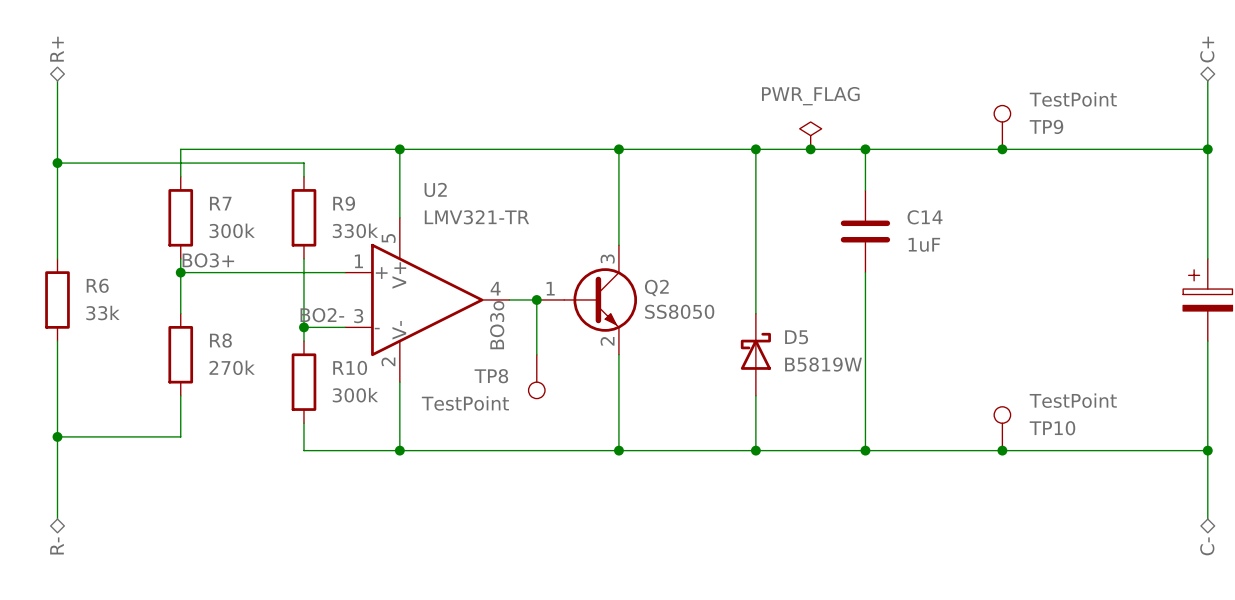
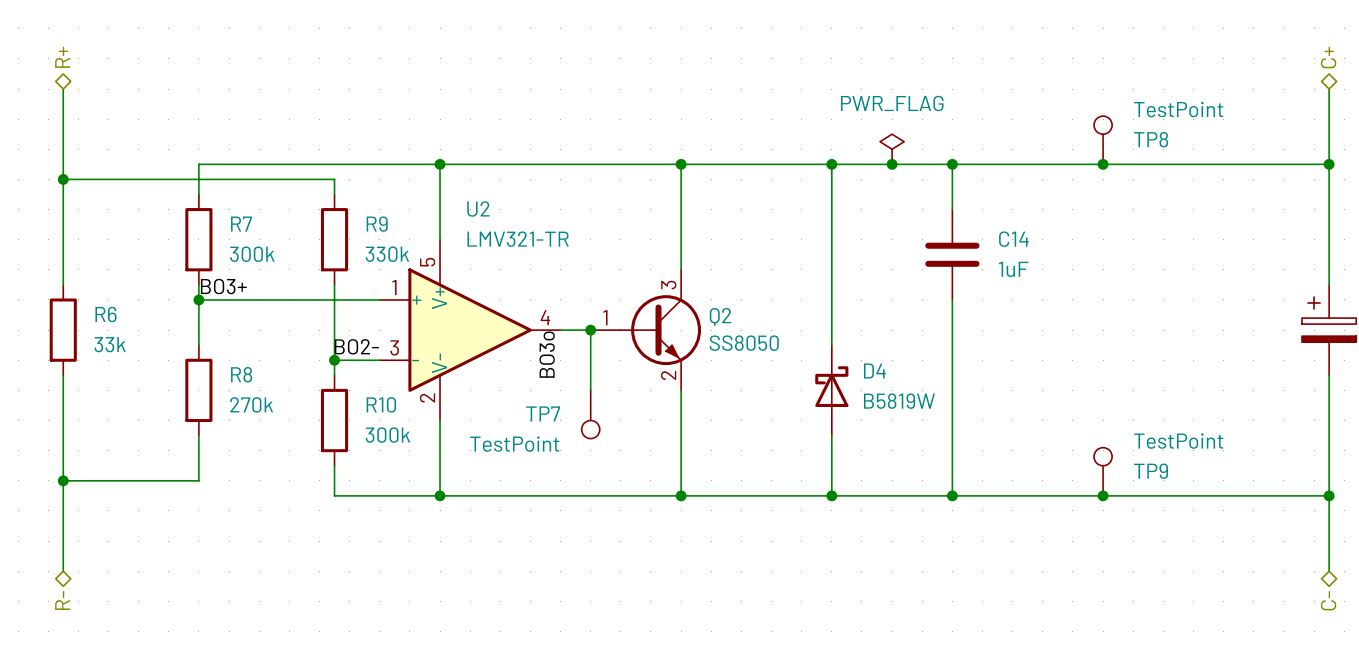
TP9 name: TP9 (1046, 126) -> TP8 (1151, 139)
D5 name: D5 (796, 337) -> D4 (874, 371)
TP8 name: TP8 (491, 376) -> TP7 (543, 413)
TP10 name: TP10 (1052, 428) -> TP9 (1151, 471)

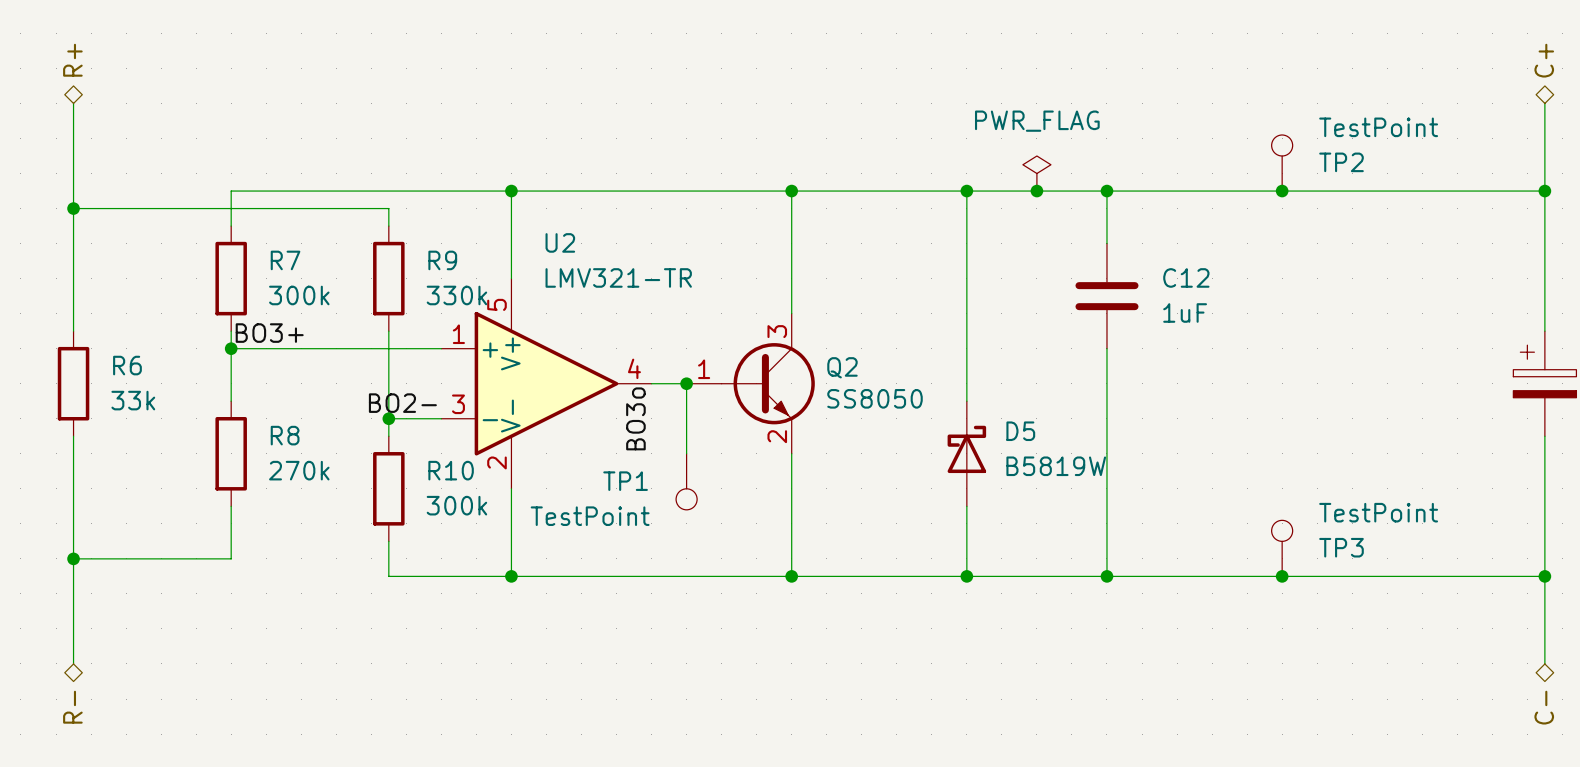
TP8 name: TP8 (1151, 139) -> TP2 (1341, 162)
C14 name: C14 (1013, 239) -> C12 (1186, 277)
D4 name: D4 (874, 371) -> D5 (1020, 431)
TP7 name: TP7 (543, 413) -> TP1 (625, 481)
TP9 name: TP9 (1151, 471) -> TP3 (1341, 547)

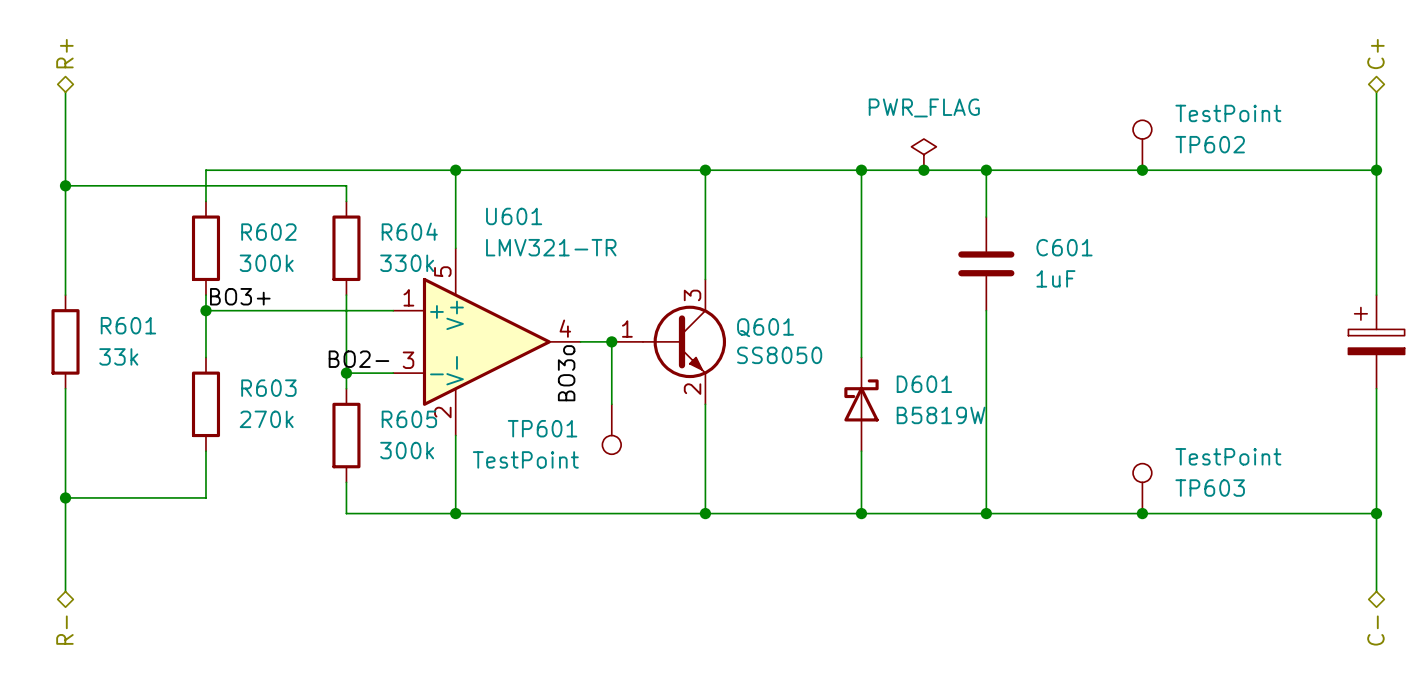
TP2 name: TP2 (1341, 162) -> TP602 (1210, 144)
U2 name: U2 (560, 242) -> U601 (514, 216)
R7 name: R7 (285, 260) -> R602 (268, 232)
R9 name: R9 (442, 260) -> R604 (409, 231)
C12 name: C12 (1186, 277) -> C601 (1064, 247)
R6 name: R6 (127, 365) -> R601 (128, 325)
Q2 name: Q2 (842, 367) -> Q601 (765, 327)
D5 name: D5 (1020, 431) -> D601 (924, 384)
R8 name: R8 (285, 435) -> R603 (268, 388)
R10 name: R10 (451, 470) -> R605 (409, 419)
TP1 name: TP1 (625, 481) -> TP601 (542, 428)
TP3 name: TP3 (1341, 547) -> TP603 (1210, 488)

